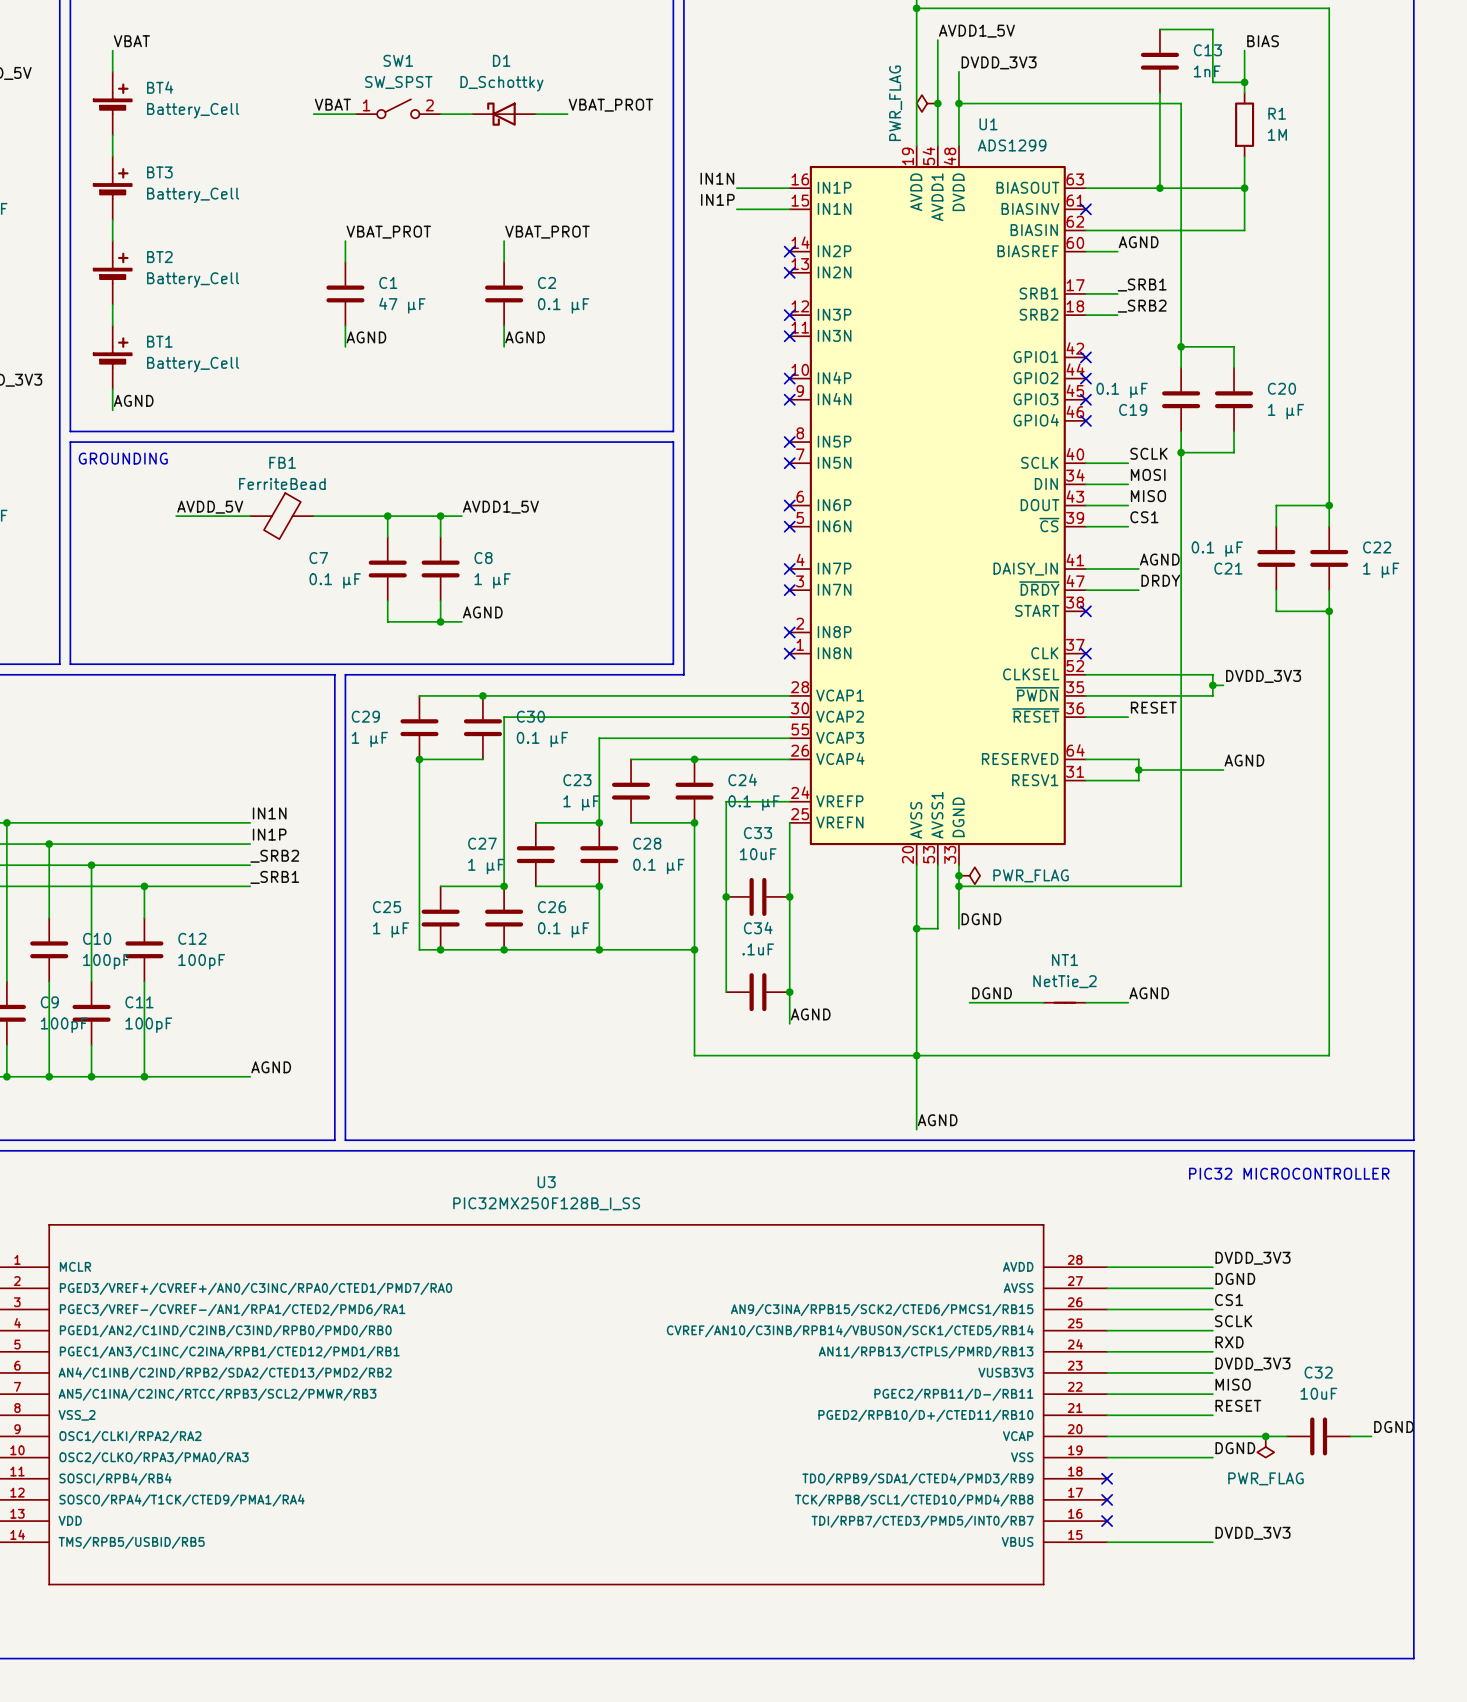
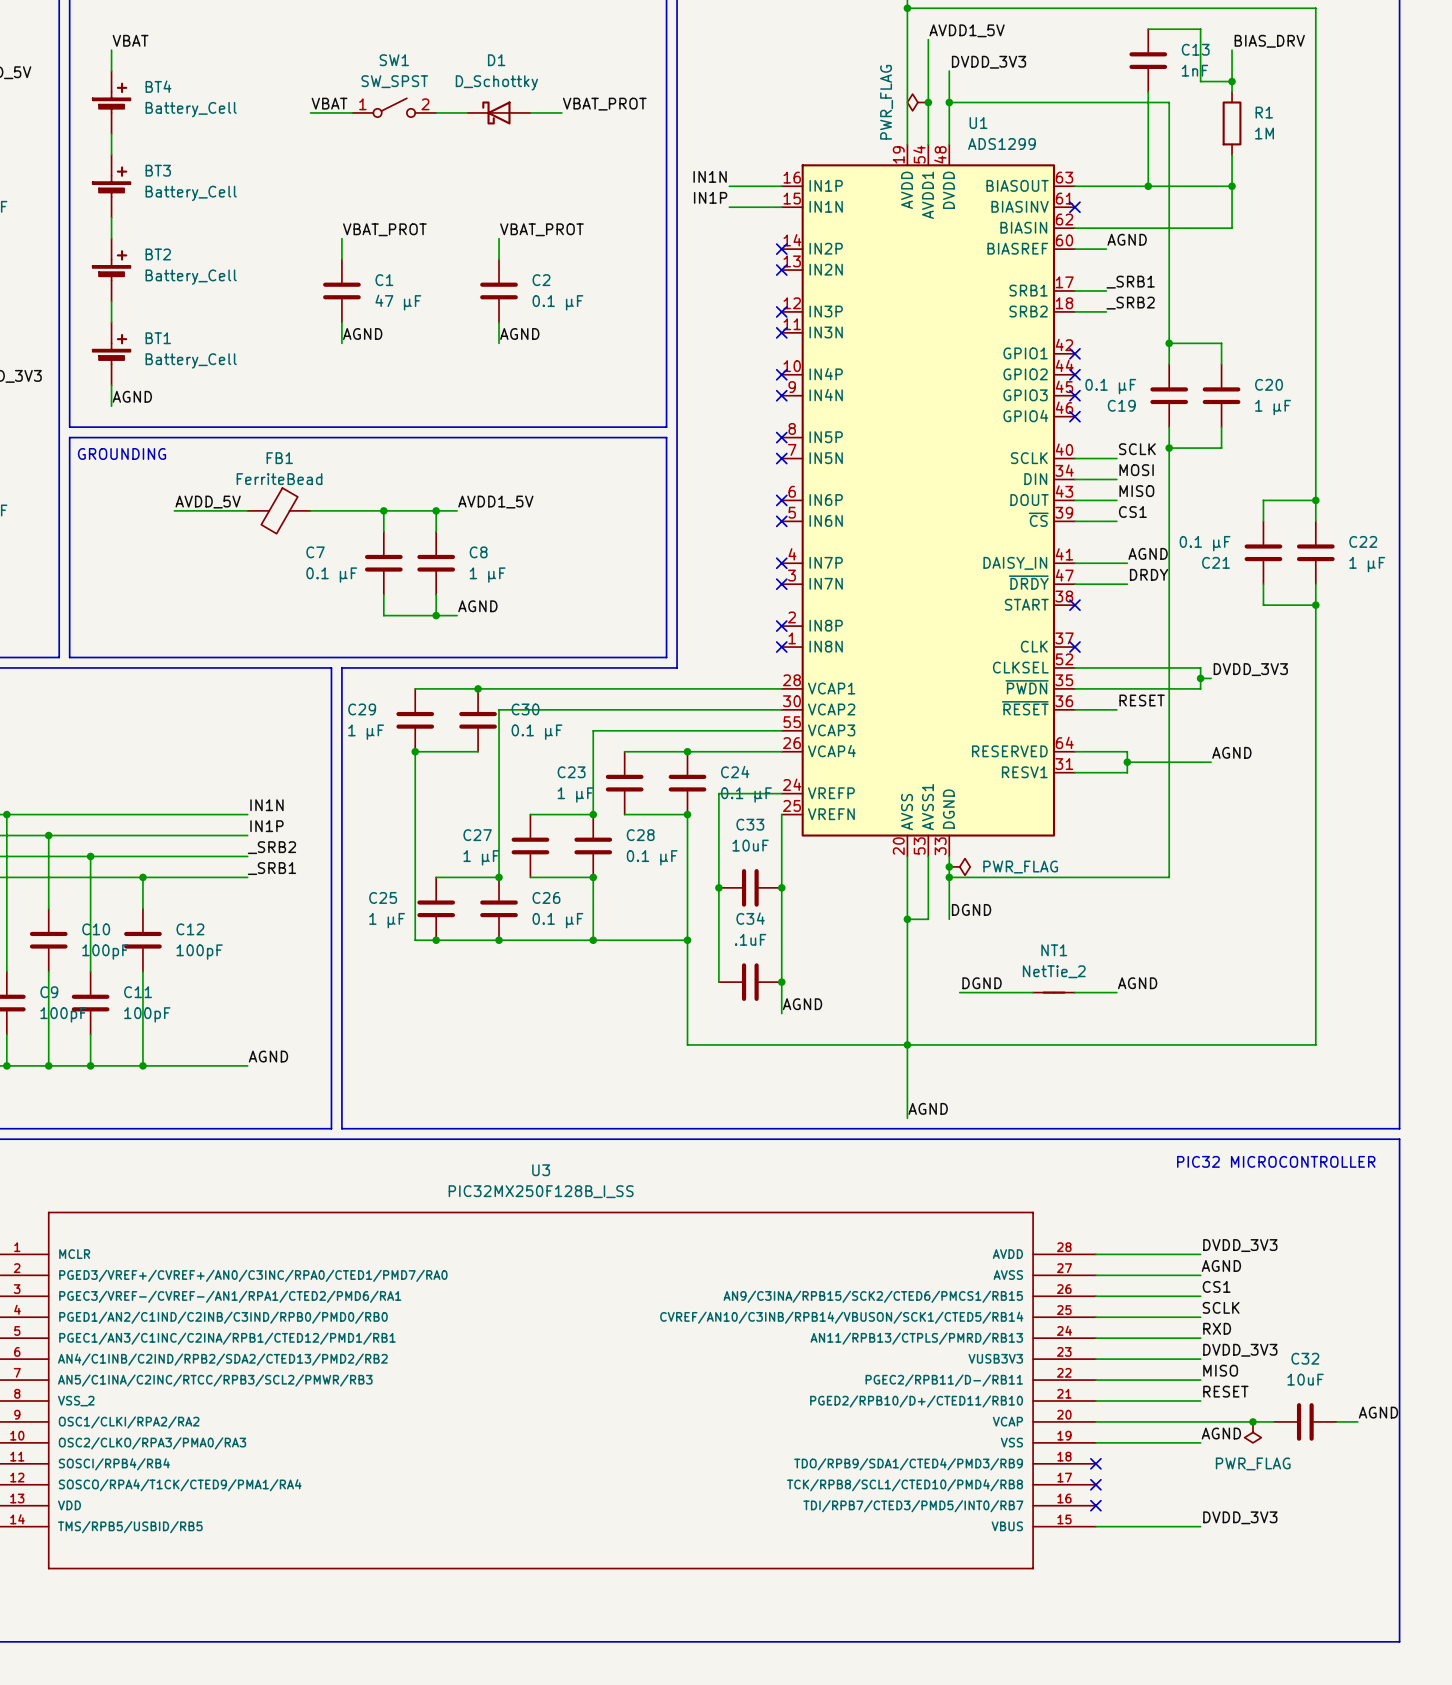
label: BIAS (1263, 41) -> BIAS_DRV (1269, 41)
label: DGND (1235, 1278) -> AGND (1221, 1265)
label: DGND (1394, 1427) -> AGND (1378, 1412)
label: DGND (1235, 1448) -> AGND (1221, 1433)

